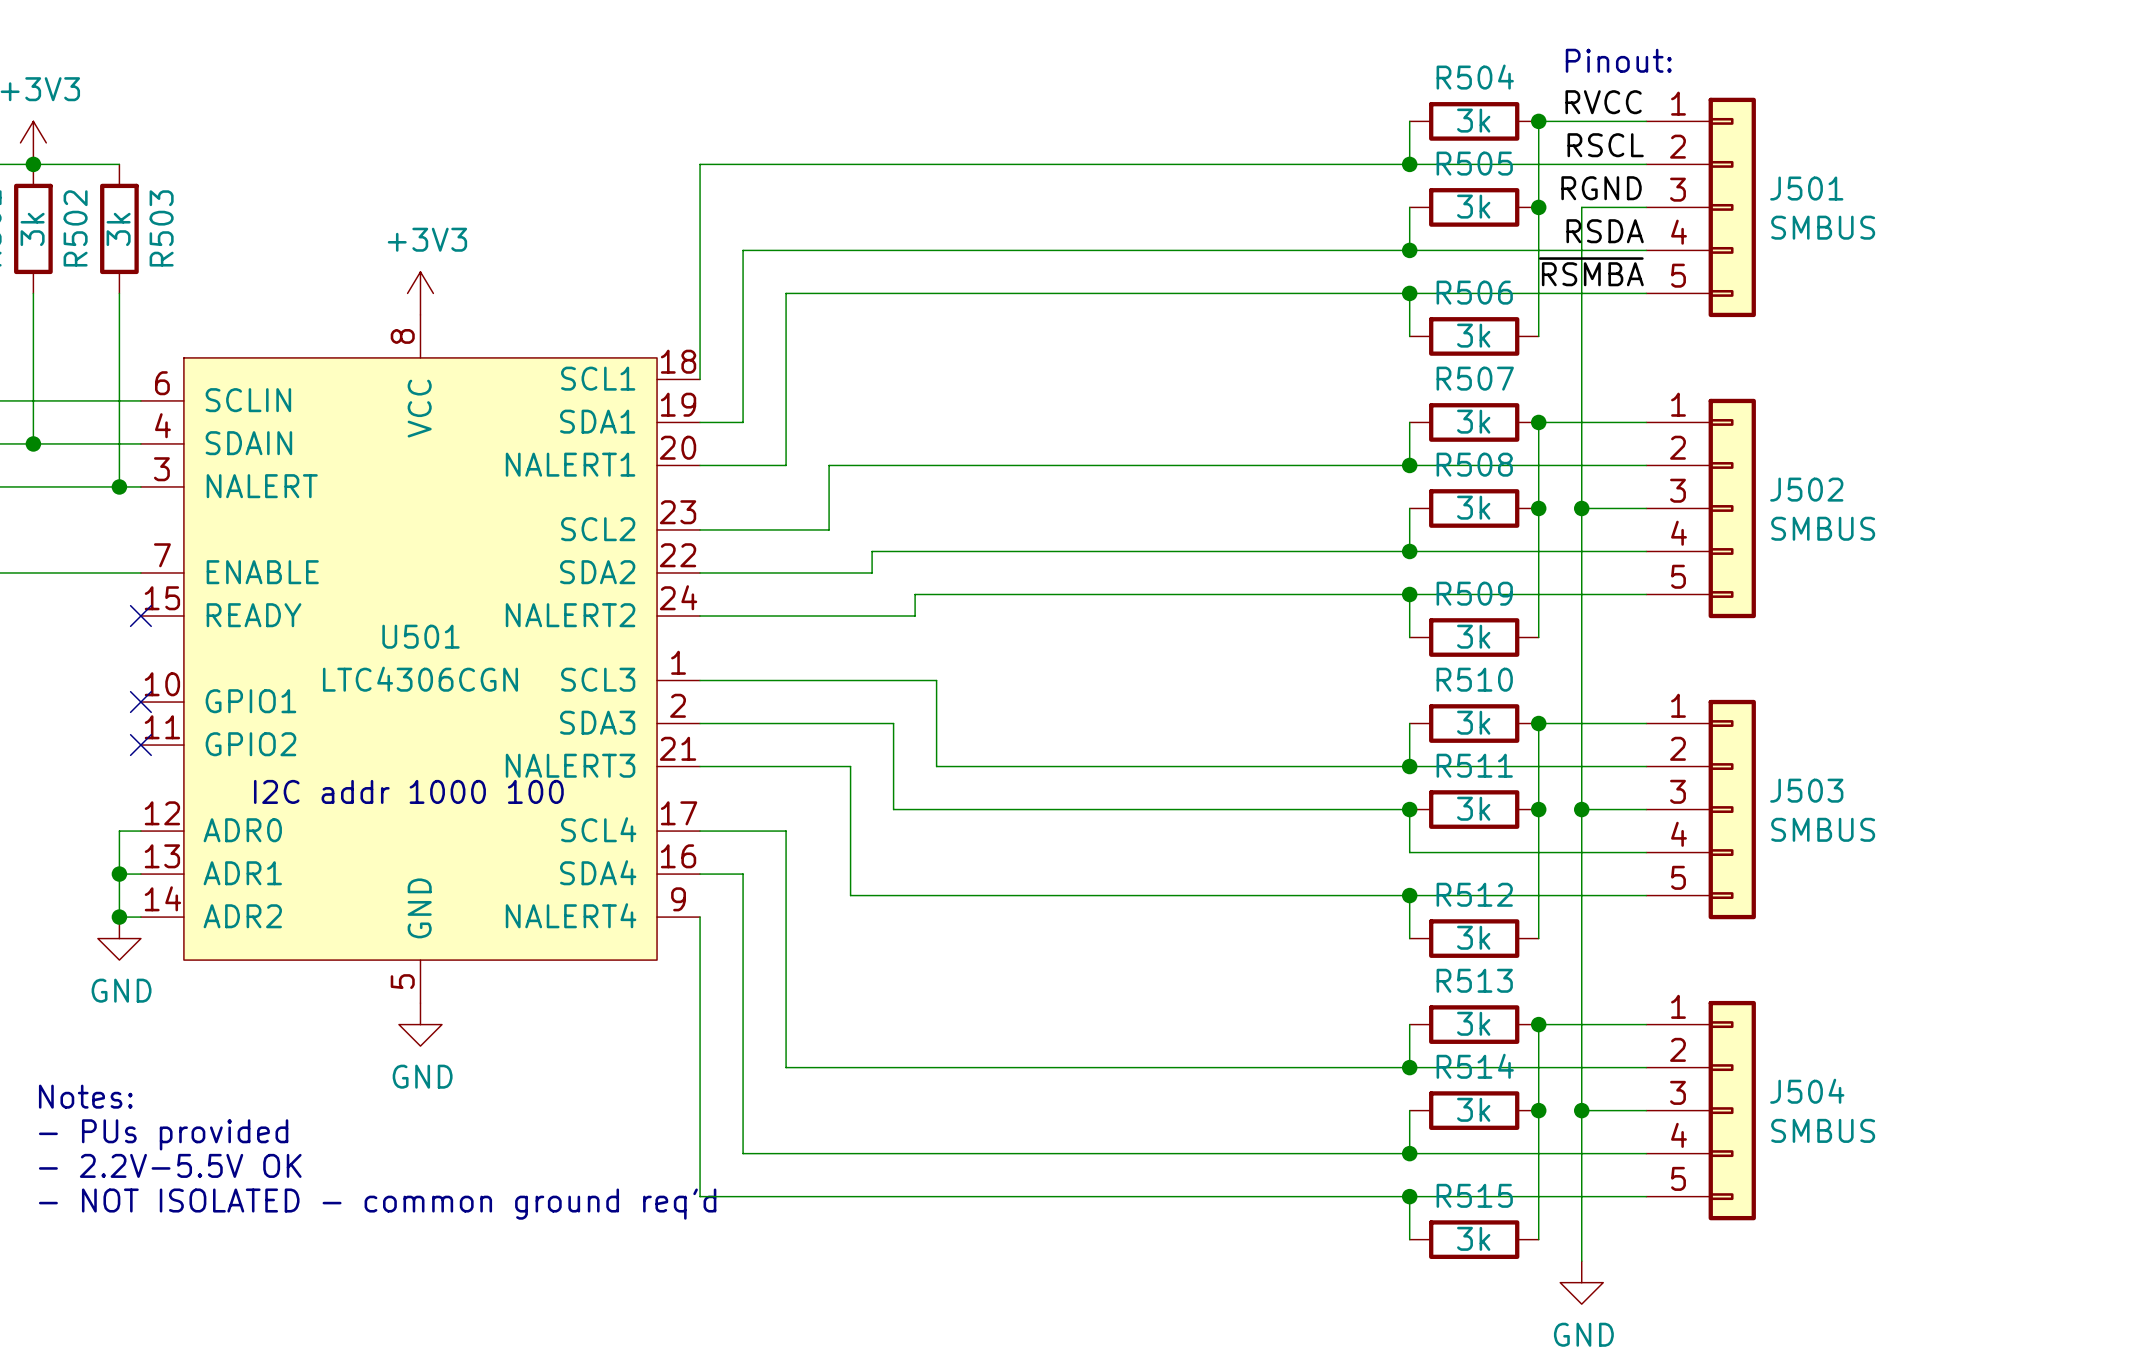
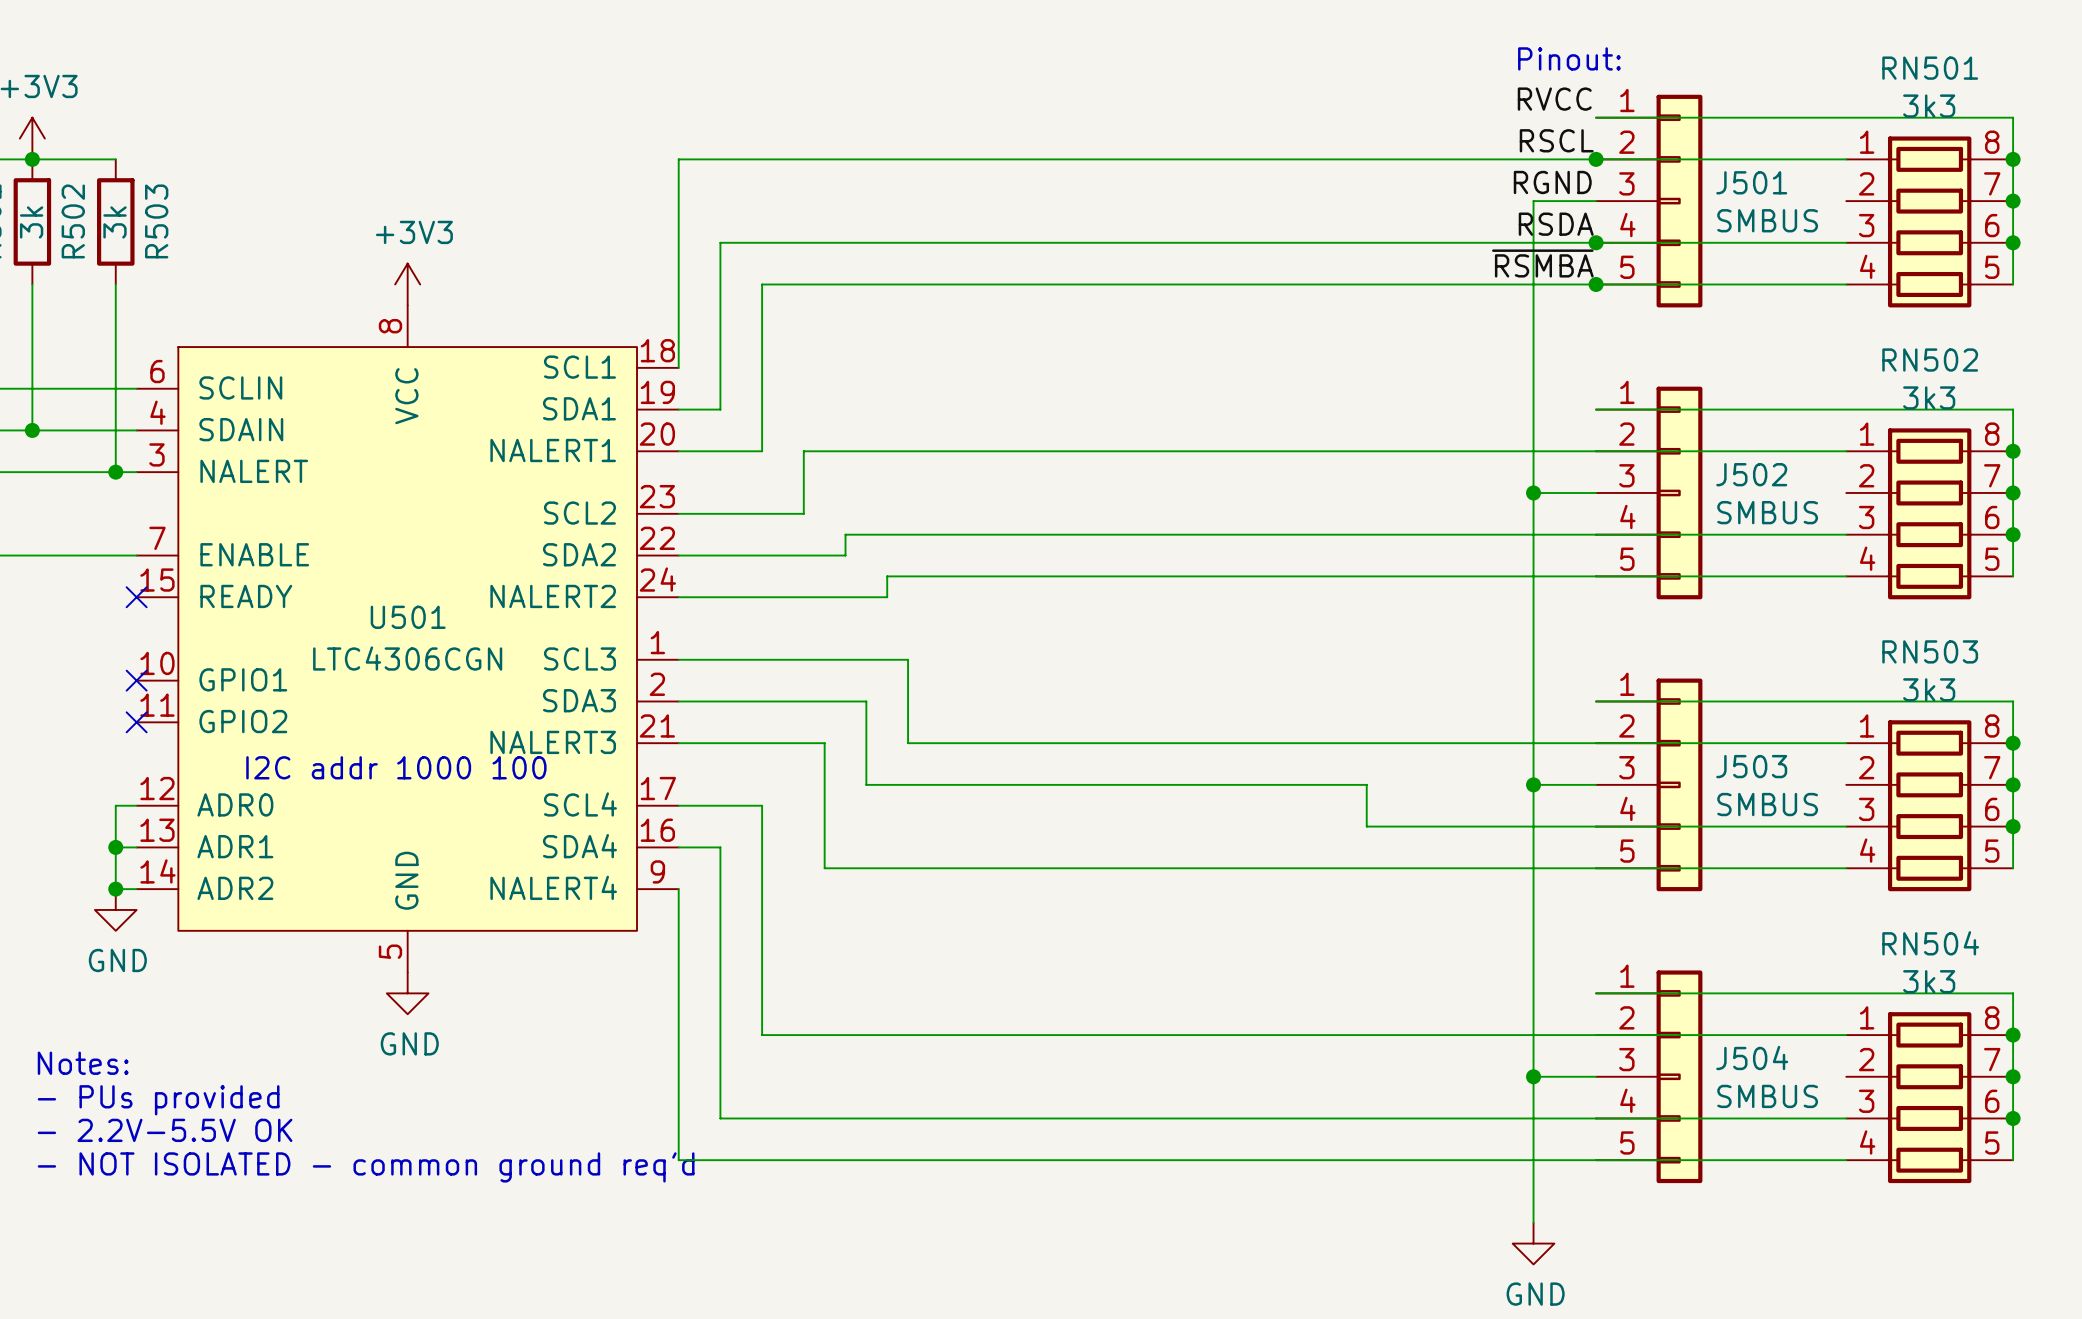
wire: (1409, 121) (1409, 164) -> none
R504: 3k (1474, 121) -> none
junction: (1538, 121) -> none
wire: (1646, 121) (1538, 121) (1538, 336) -> (1596, 117) (2013, 117) (2013, 284)
junction: (1409, 164) -> none
wire: none -> (1596, 159) (1846, 159)
junction: none -> (1596, 159)
junction: none -> (2013, 159)
wire: (1409, 207) (1409, 250) -> none
R505: 3k (1474, 207) -> none
junction: (1538, 207) -> none
junction: none -> (2013, 201)
RN501: none -> 3k3 (1929, 221)
junction: (1409, 250) -> none
wire: none -> (1596, 242) (1846, 242)
junction: none -> (1596, 242)
junction: none -> (2013, 242)
wire: (1409, 293) (1409, 336) -> none
junction: (1409, 293) -> none
wire: none -> (1596, 284) (1846, 284)
junction: none -> (1596, 284)
R506: 3k (1474, 336) -> none
wire: (1409, 422) (1409, 465) -> none
R507: 3k (1474, 422) -> none
junction: (1538, 422) -> none
wire: (1646, 422) (1538, 422) (1538, 637) -> (1596, 409) (2013, 409) (2013, 576)
junction: (1409, 465) -> none
wire: none -> (1596, 451) (1846, 451)
junction: none -> (2013, 451)
wire: (1409, 508) (1409, 551) -> none
R508: 3k (1474, 508) -> none
junction: (1538, 508) -> none
junction: none -> (2013, 492)
RN502: none -> 3k3 (1929, 513)
junction: (1409, 551) -> none
wire: none -> (1596, 534) (1846, 534)
junction: none -> (2013, 534)
wire: (1409, 594) (1409, 637) -> none
junction: (1409, 594) -> none
wire: none -> (1596, 576) (1846, 576)
R509: 3k (1474, 637) -> none
wire: (1409, 723) (1409, 766) -> none
R510: 3k (1474, 723) -> none
junction: (1538, 723) -> none
wire: (1646, 723) (1538, 723) (1538, 938) -> (1596, 701) (2013, 701) (2013, 868)
junction: (1409, 766) -> none
wire: none -> (1596, 743) (1846, 743)
junction: none -> (2013, 743)
junction: (1409, 809) -> none
R511: 3k (1474, 809) -> none
junction: (1538, 809) -> none
junction: none -> (2013, 784)
RN503: none -> 3k3 (1929, 805)
wire: none -> (1596, 826) (1846, 826)
junction: none -> (2013, 826)
wire: (1409, 895) (1409, 938) -> none
junction: (1409, 895) -> none
wire: none -> (1596, 868) (1846, 868)
R512: 3k (1474, 938) -> none
wire: (1409, 1024) (1409, 1067) -> none
R513: 3k (1474, 1024) -> none
junction: (1538, 1024) -> none
wire: (1646, 1024) (1538, 1024) (1538, 1239) -> (1596, 993) (2013, 993) (2013, 1160)
junction: (1409, 1067) -> none
wire: none -> (1596, 1035) (1846, 1035)
junction: none -> (2013, 1035)
wire: (1409, 1110) (1409, 1153) -> none
R514: 3k (1474, 1110) -> none
junction: (1538, 1110) -> none
junction: none -> (2013, 1076)
RN504: none -> 3k3 (1929, 1097)
junction: (1409, 1153) -> none
wire: none -> (1596, 1118) (1846, 1118)
junction: none -> (2013, 1118)
wire: (1409, 1196) (1409, 1239) -> none
junction: (1409, 1196) -> none
wire: none -> (1596, 1160) (1846, 1160)
R515: 3k (1474, 1239) -> none

